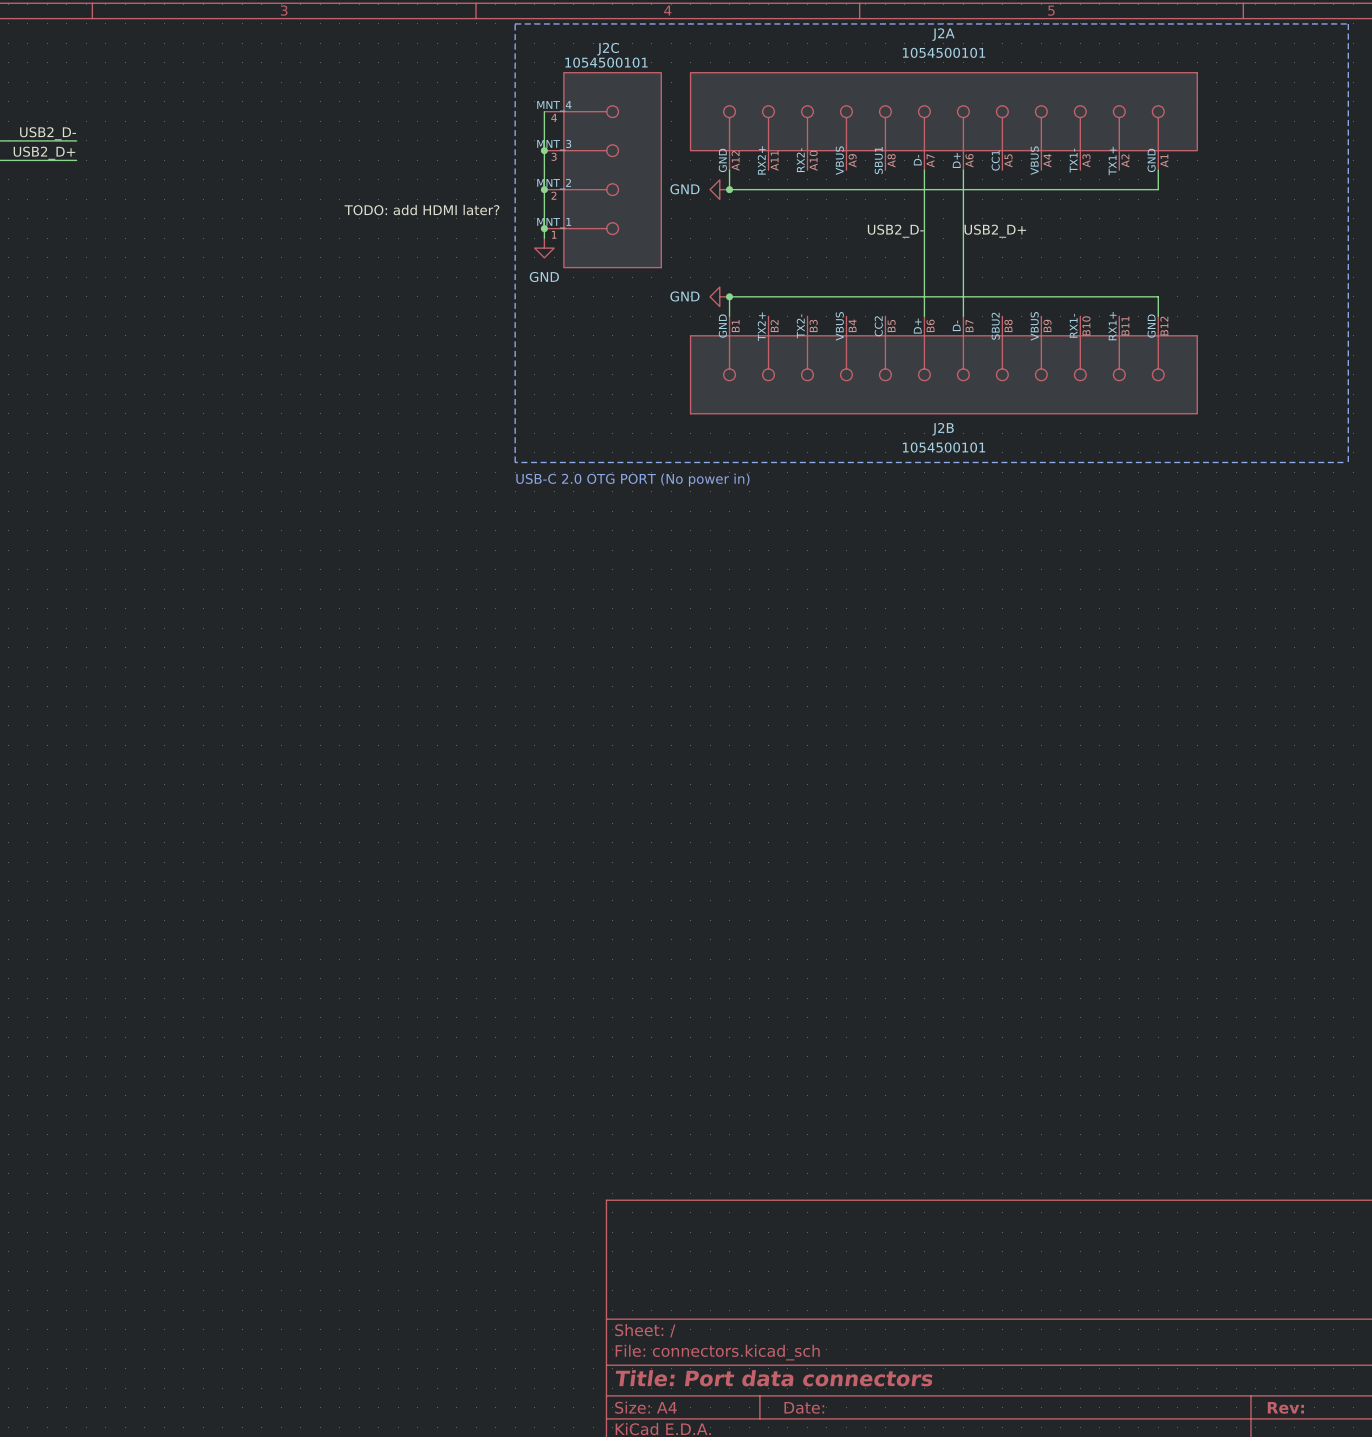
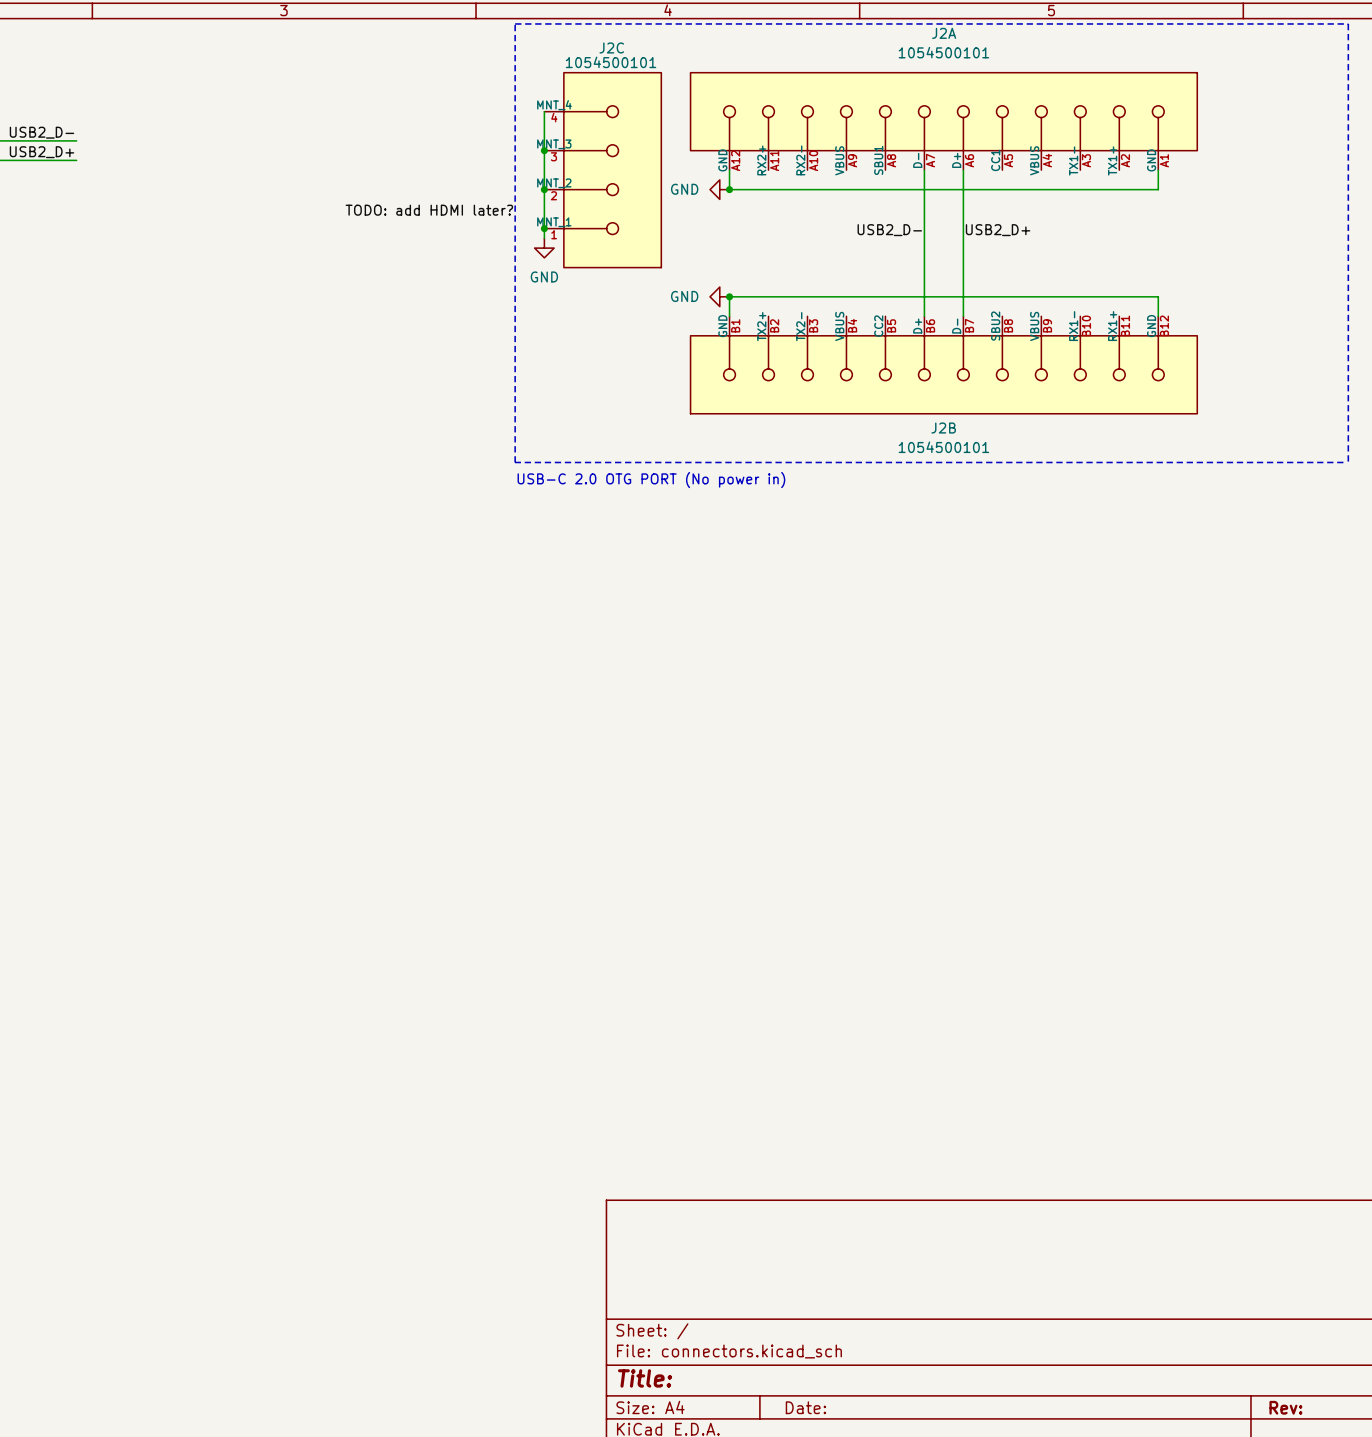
title block: Title: Port data connectors (774, 1378) -> Title: (645, 1378)

